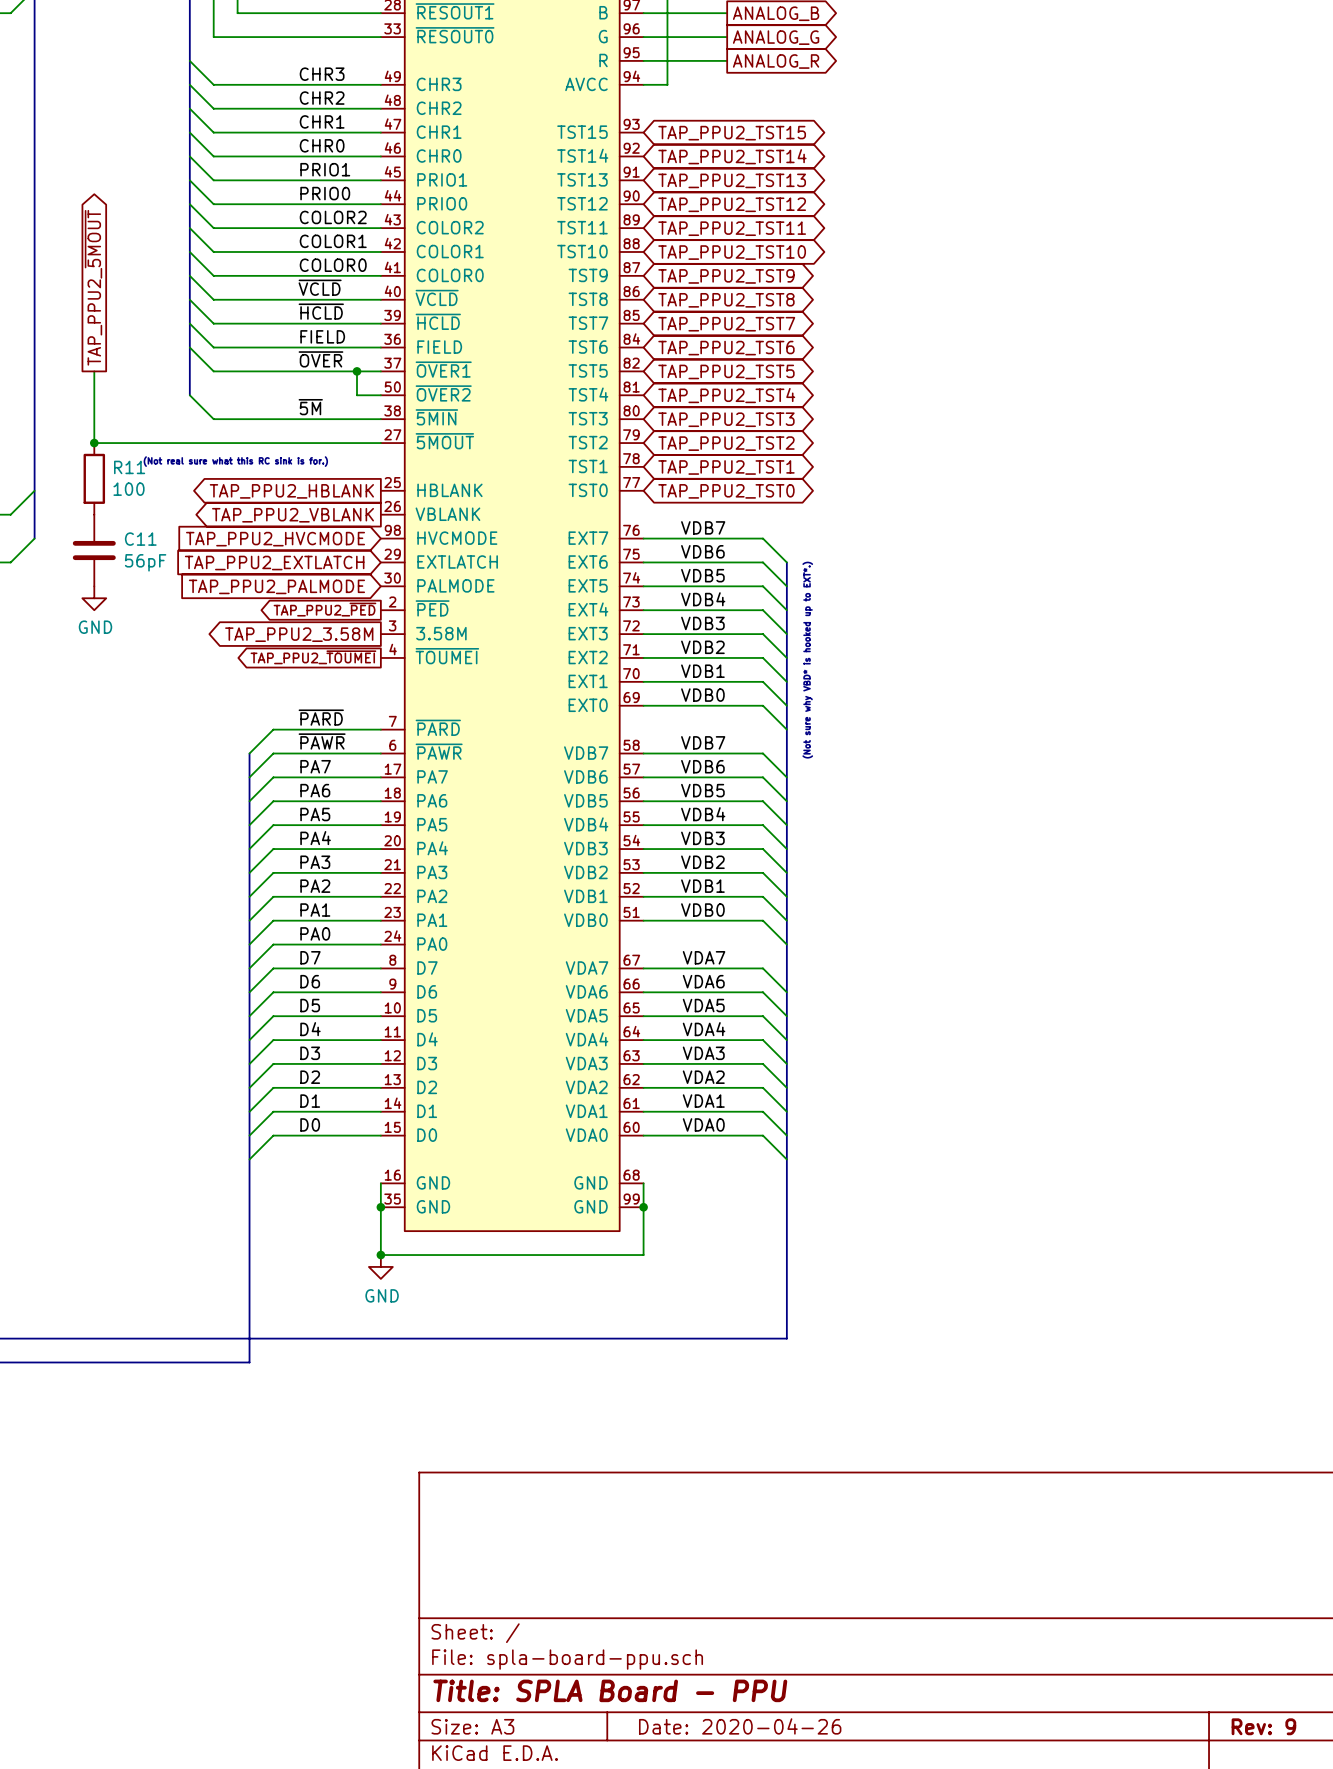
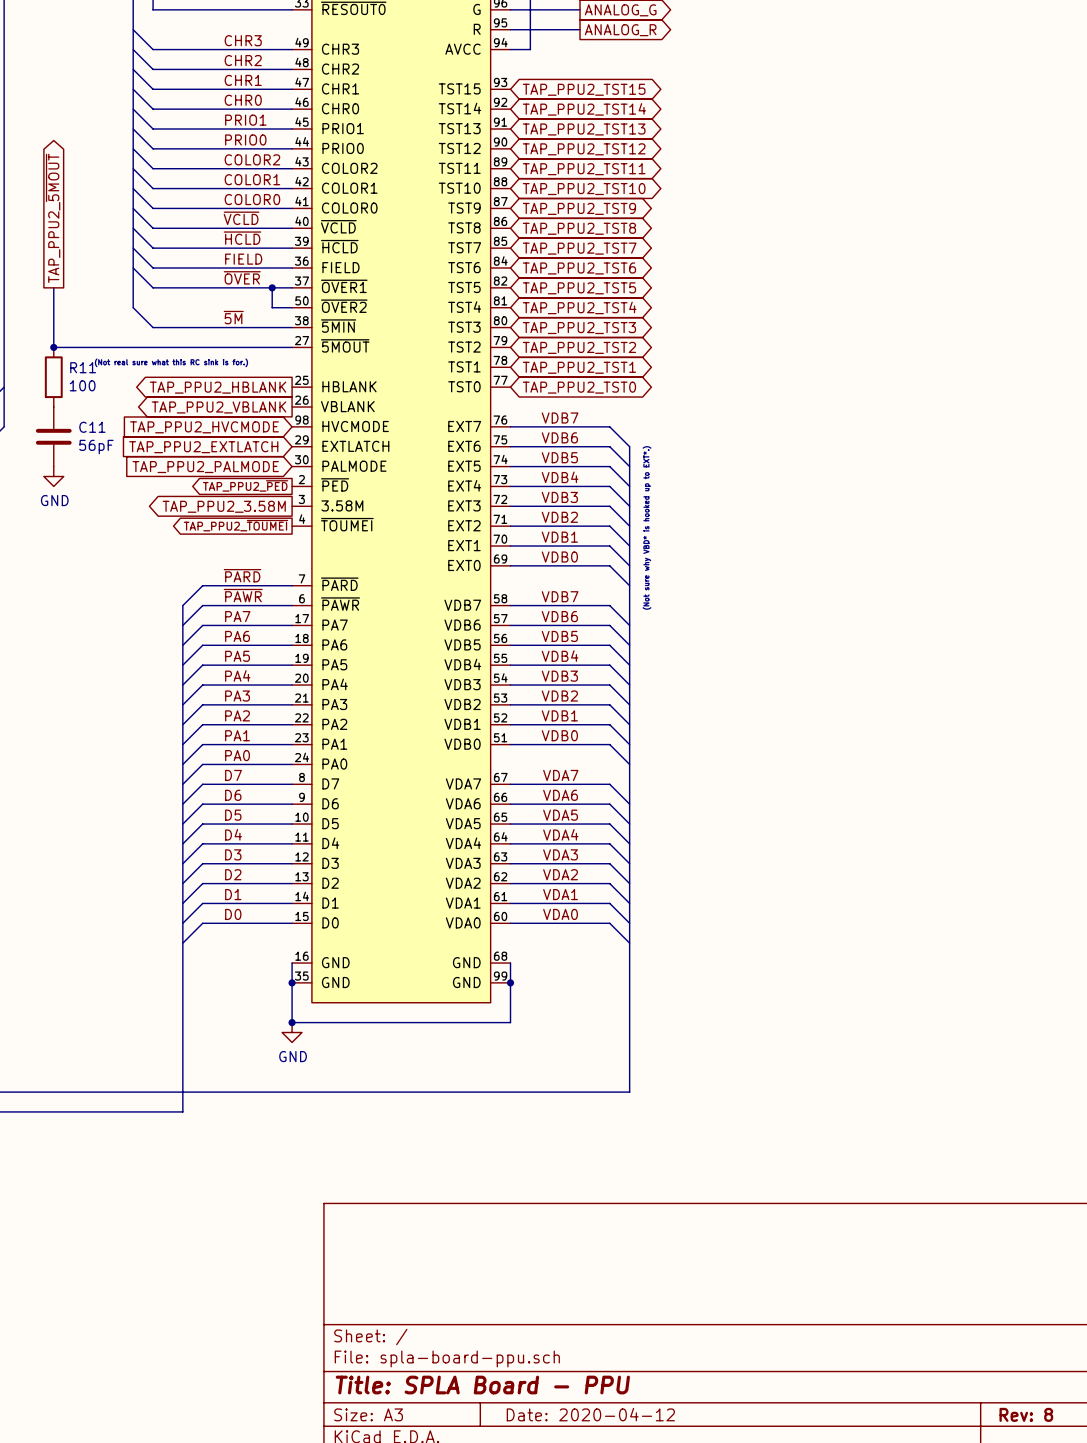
title block: Date: 2020-04-26 (740, 1726) -> Date: 2020-04-12 (590, 1414)
title block: Rev: 9 (1263, 1726) -> Rev: 8 (1026, 1414)

